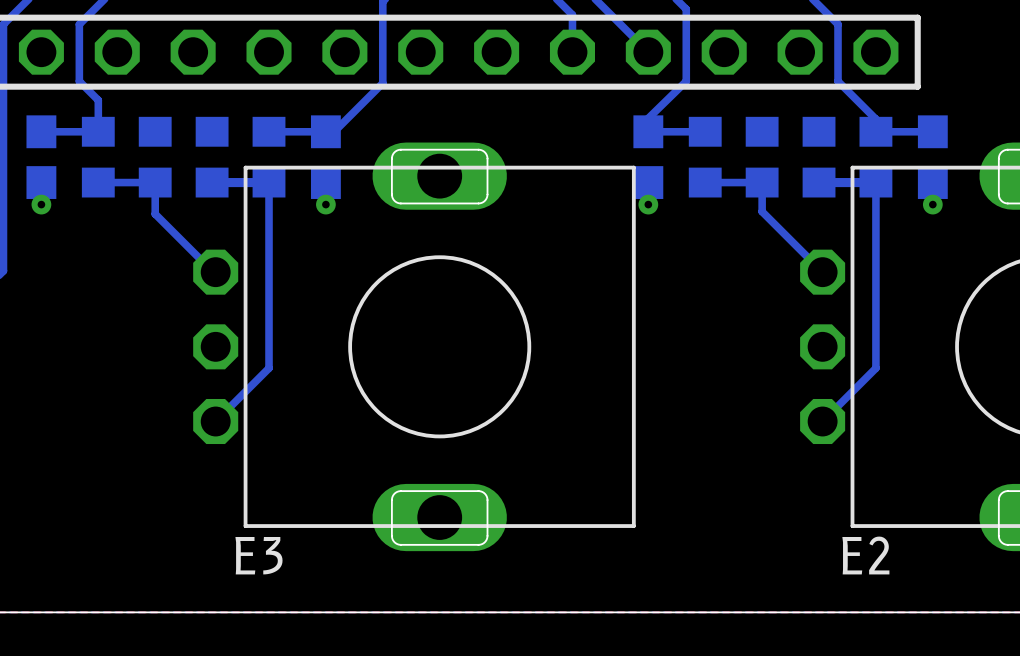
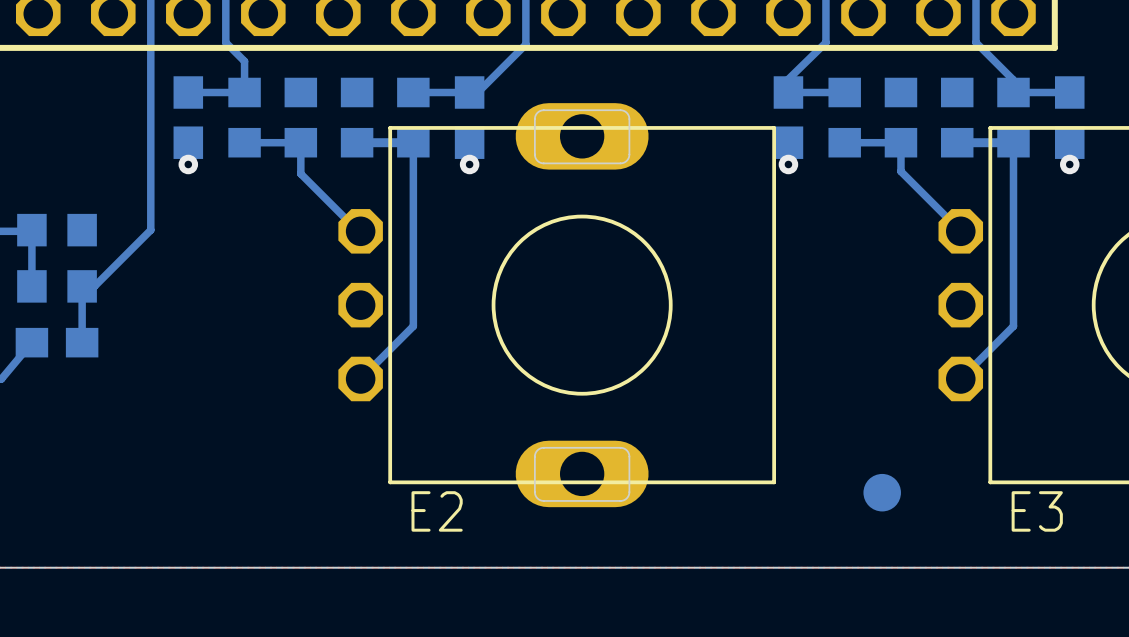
part: none -> (882, 492)
E3 name position: E3 (258, 555) -> E3 (1037, 511)
E2 name position: E2 (865, 555) -> E2 (437, 511)

